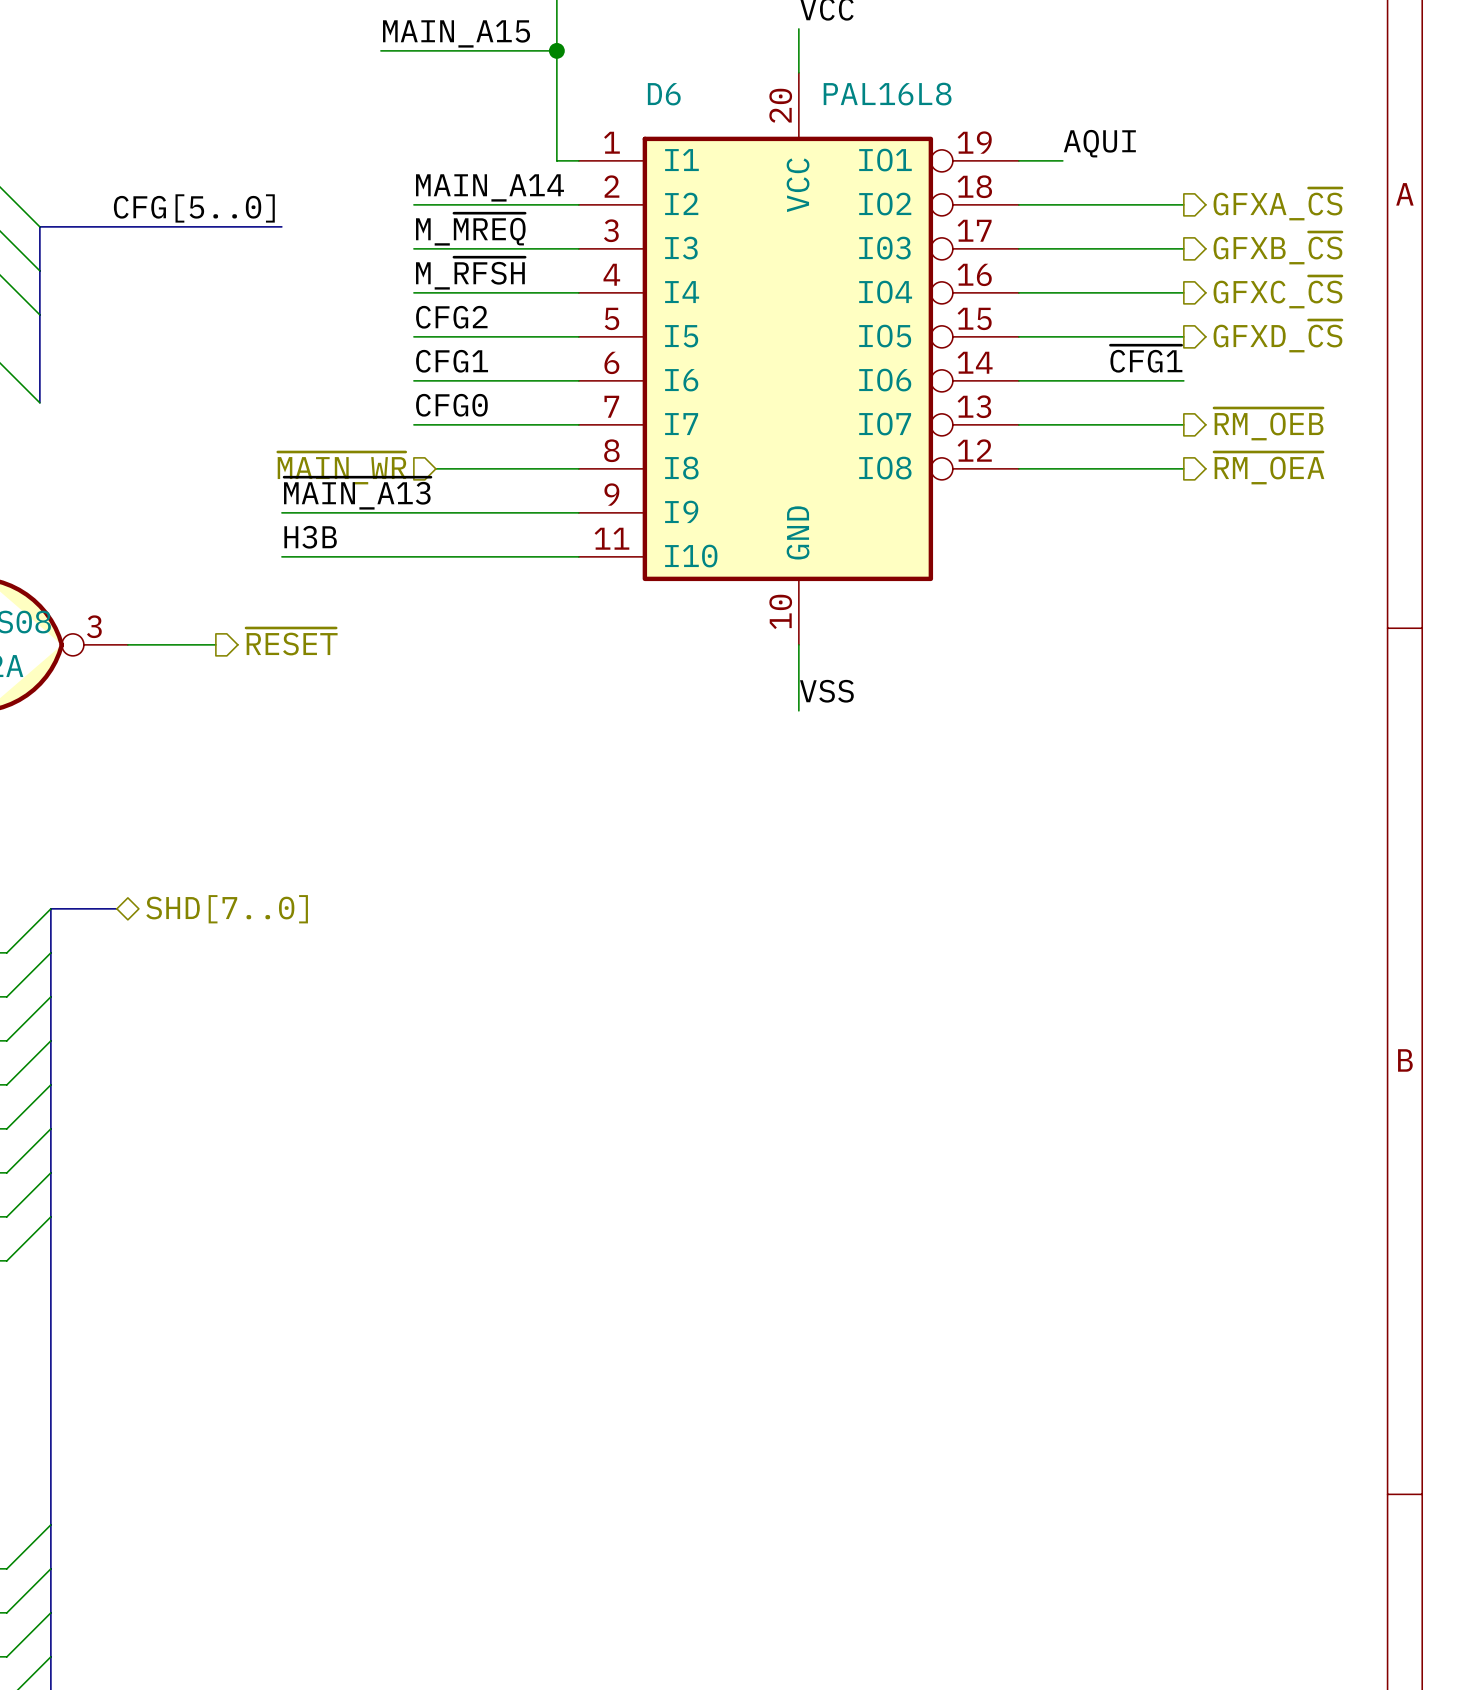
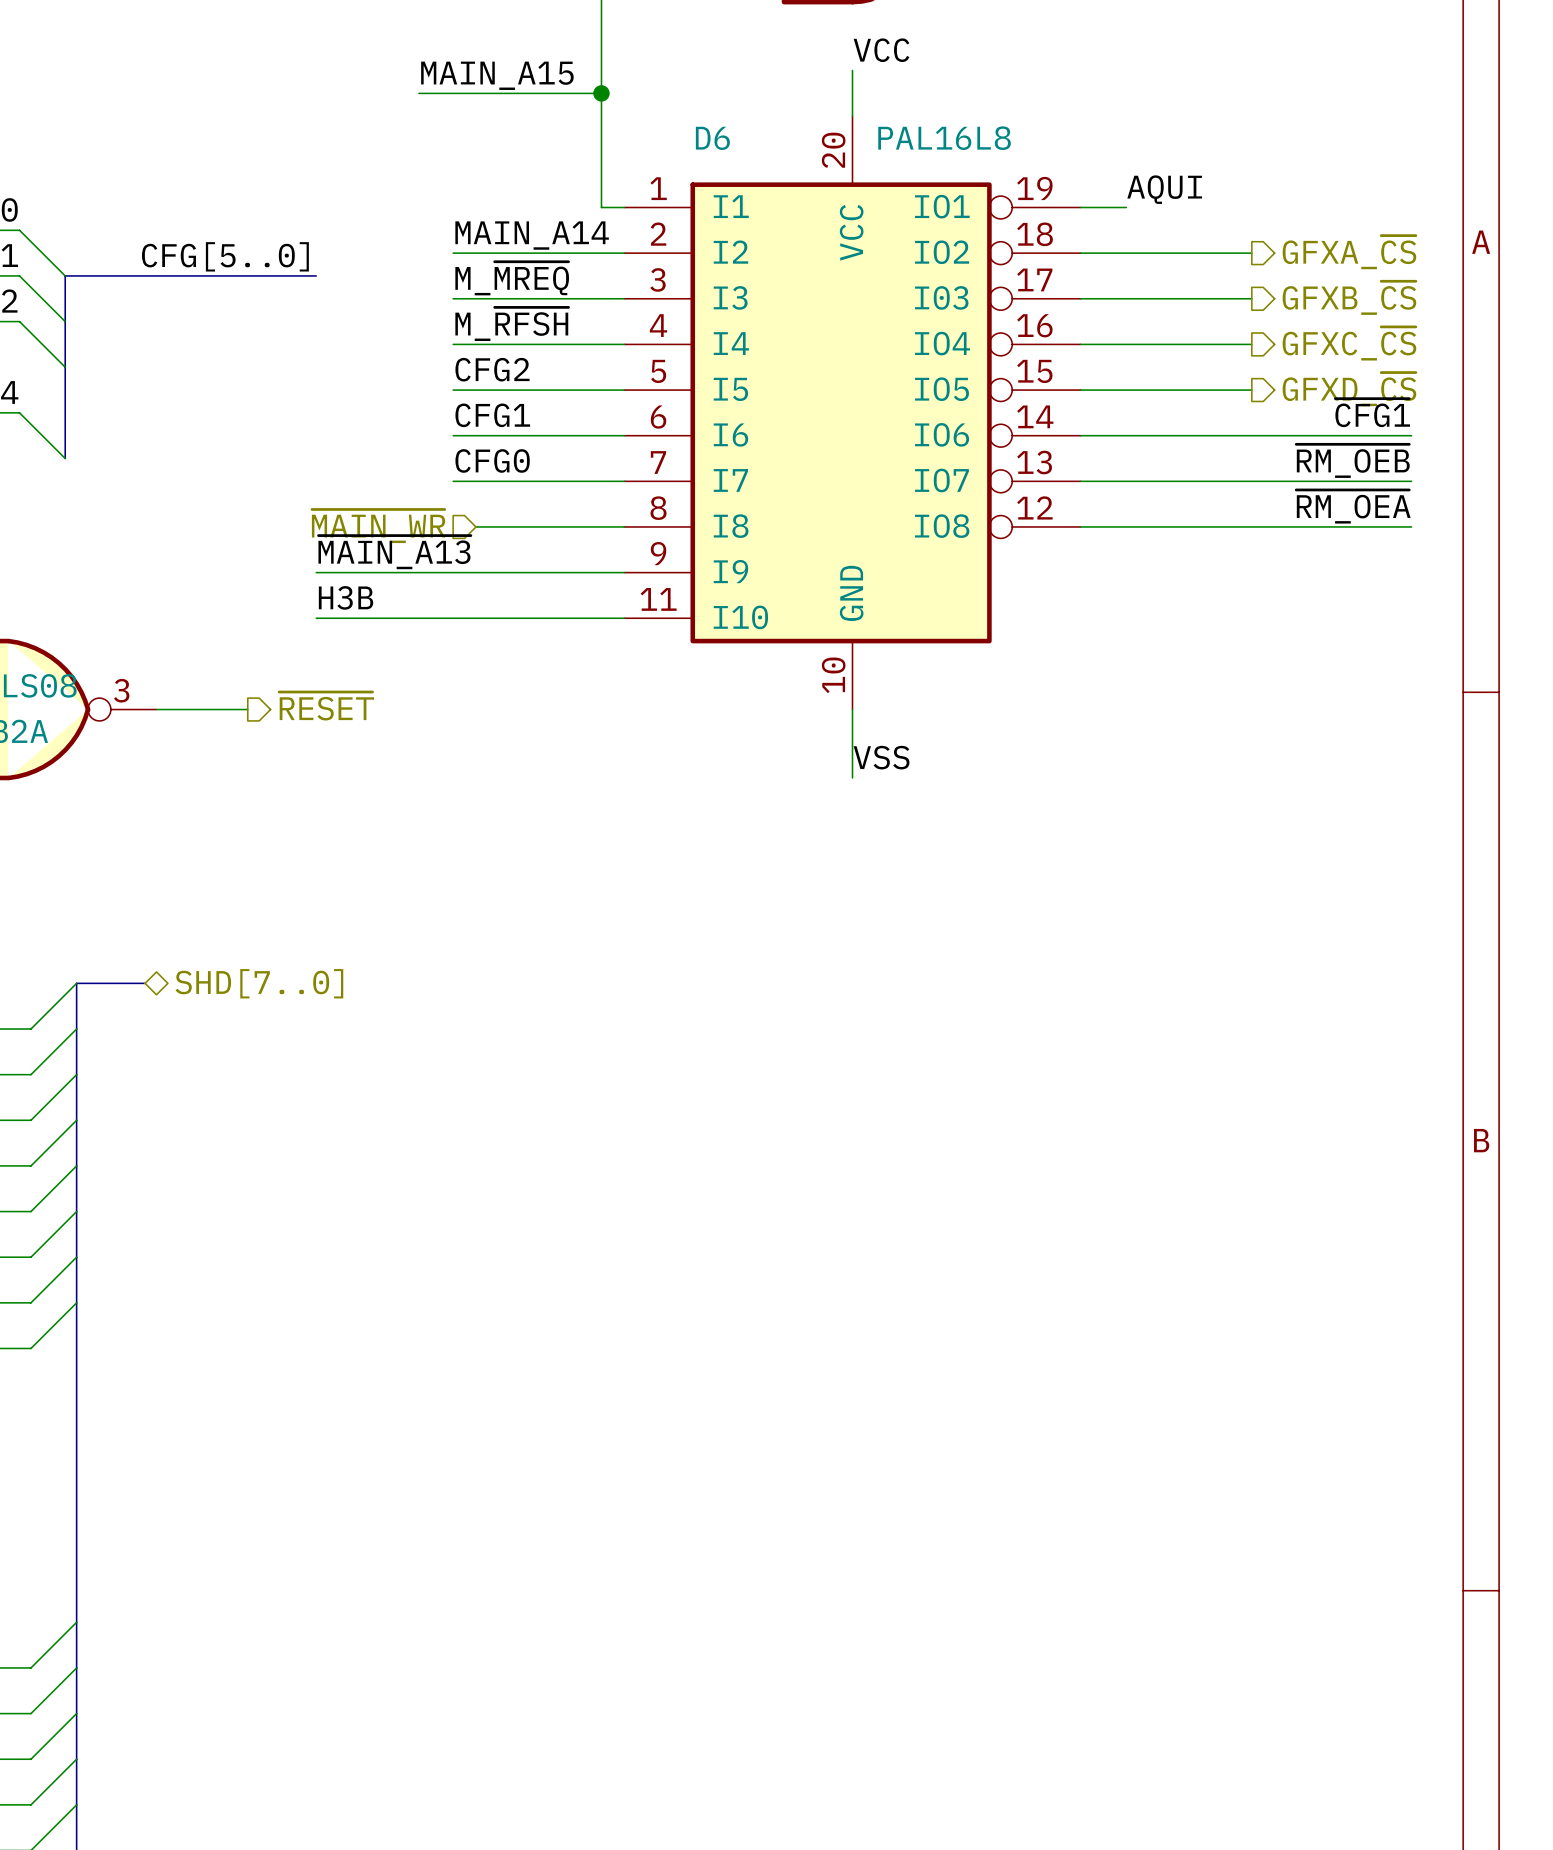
label position: ~{CFG1} (1146, 358) -> ~{CFG1} (1372, 412)
wire: none -> (1251, 435) (1411, 435)
label: none -> ~{RM_OEB} (1352, 461)
wire: none -> (1251, 481) (1411, 481)
hierarchical label: ~{RM_OEB} (1268, 424) -> none
label: none -> ~{RM_OEA} (1353, 506)
wire: none -> (1251, 526) (1411, 526)
hierarchical label: ~{RM_OEA} (1269, 468) -> none

